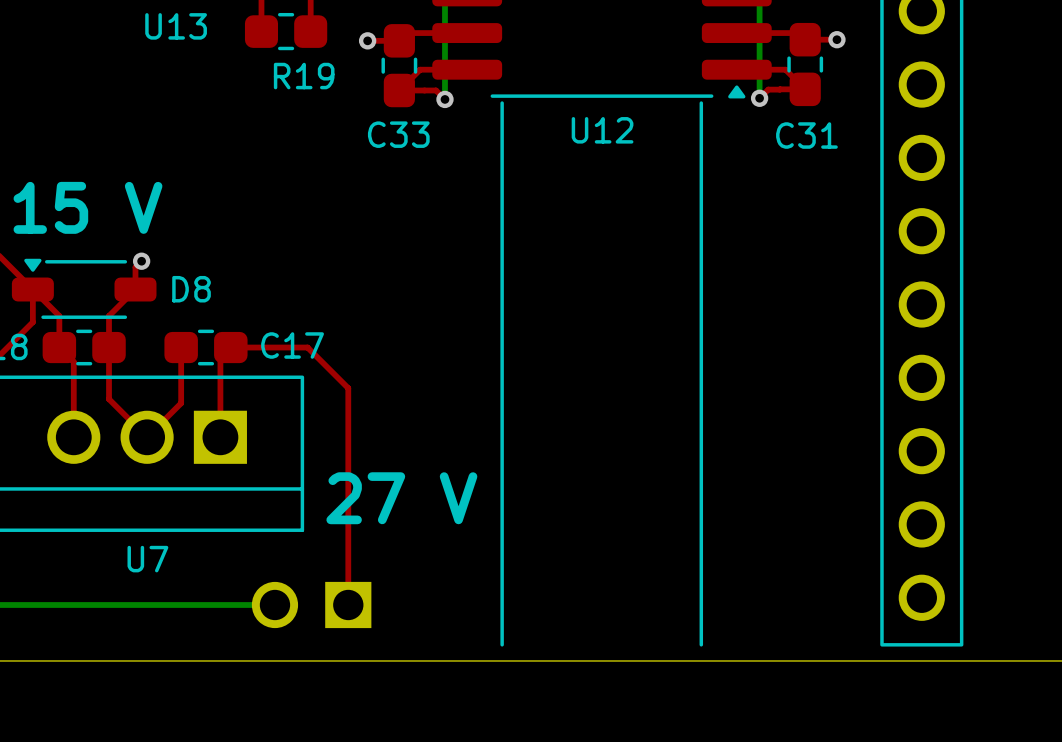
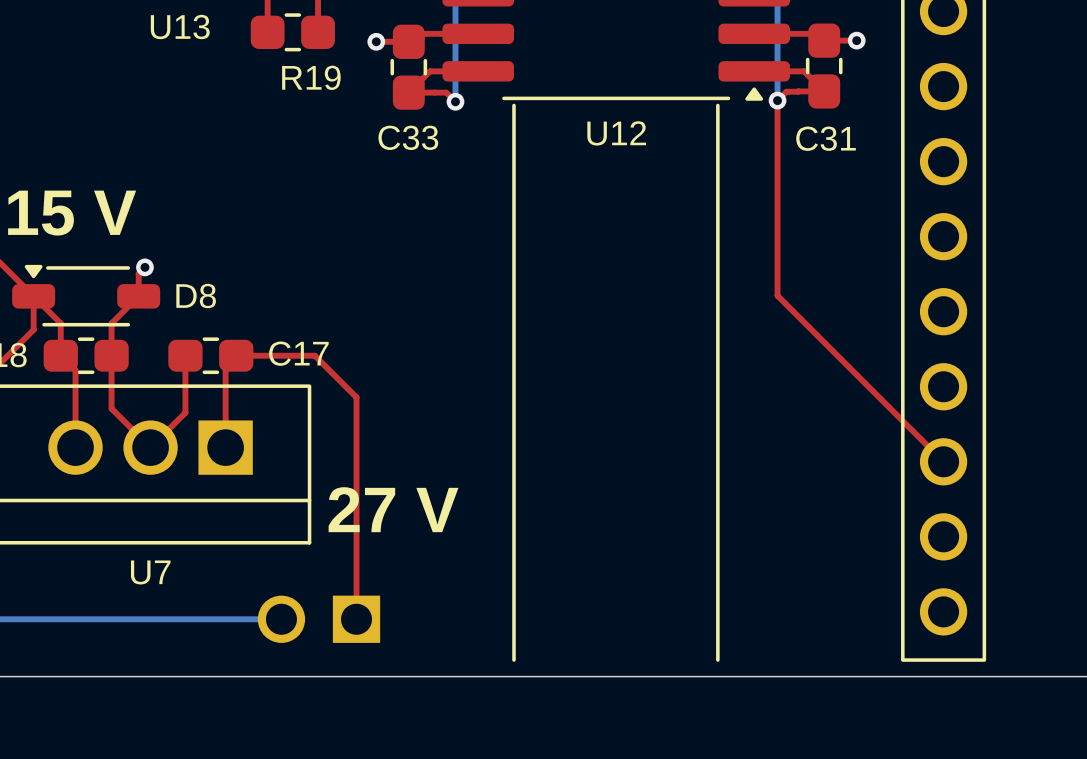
top track: none -> (777, 100) (777, 295) (943, 461)

